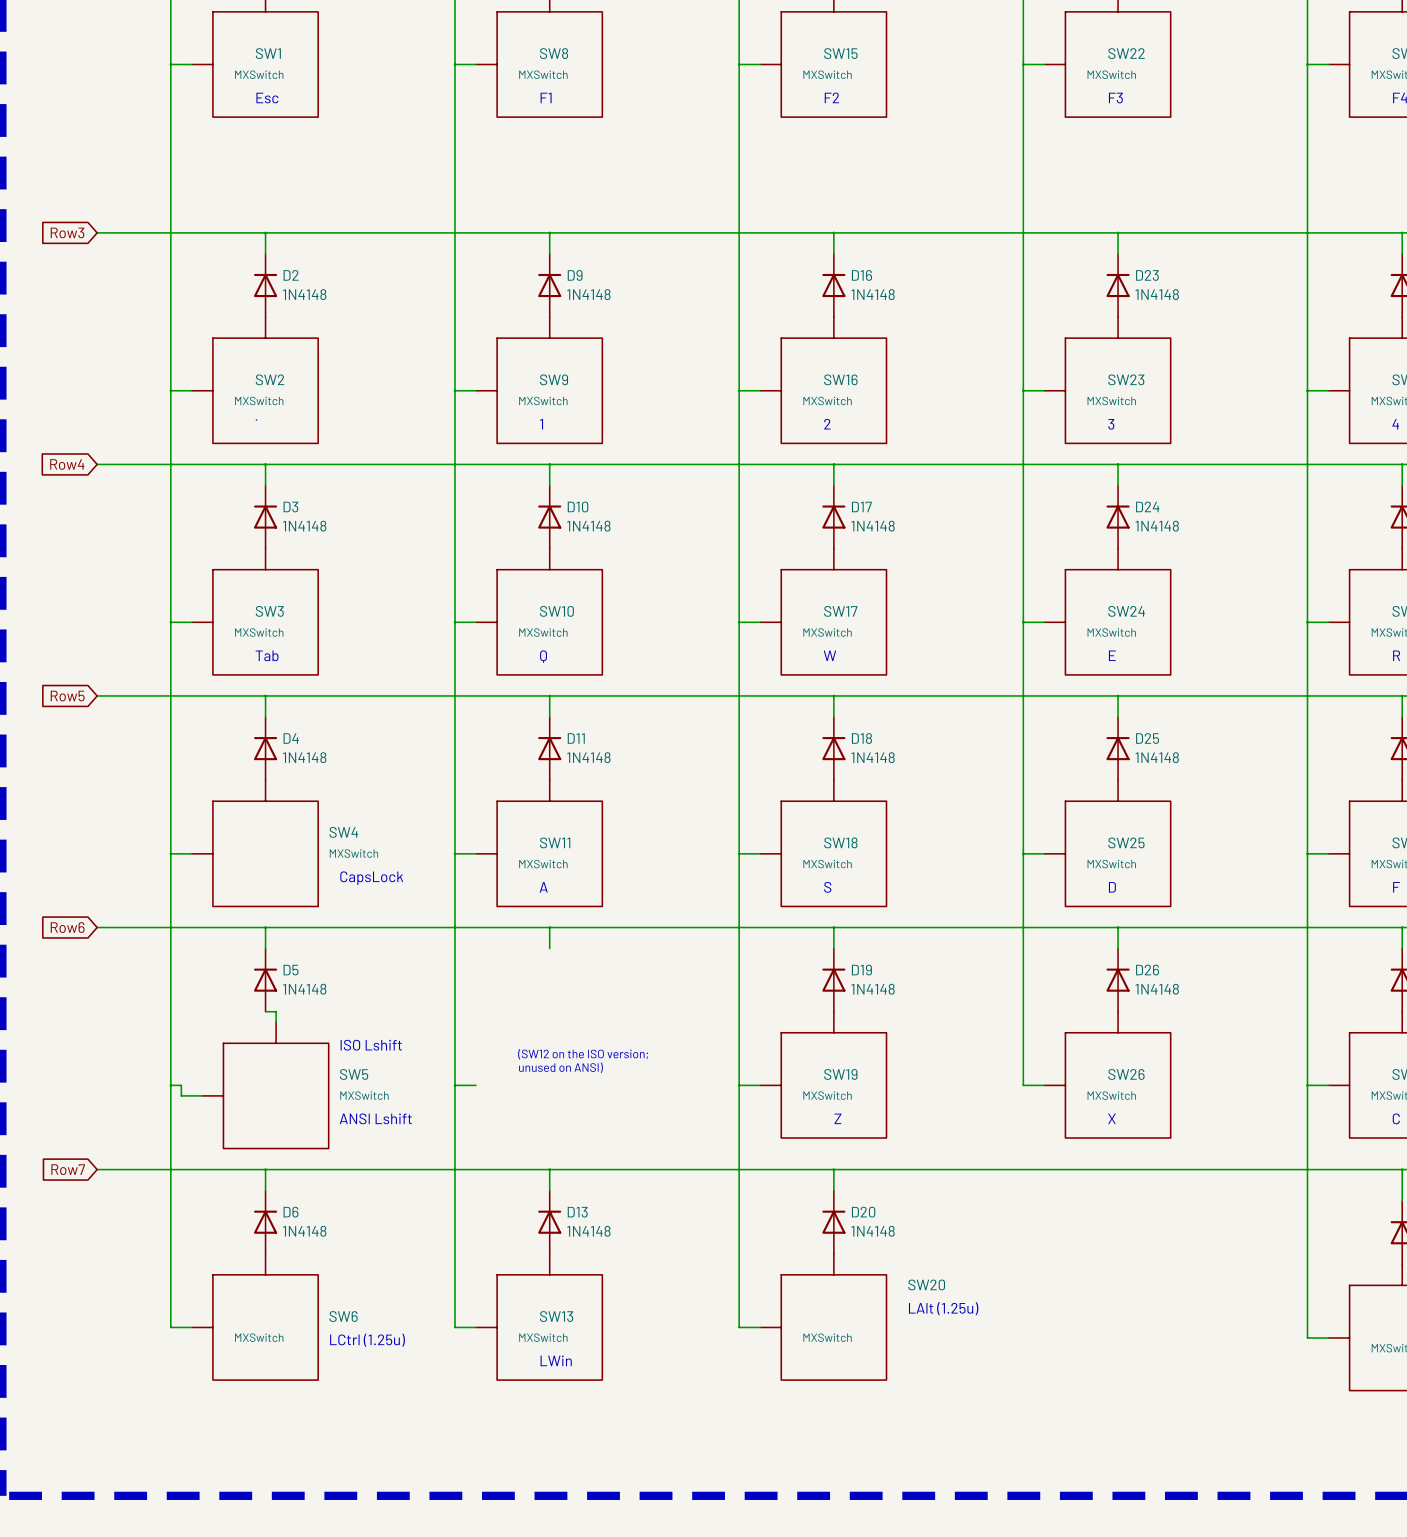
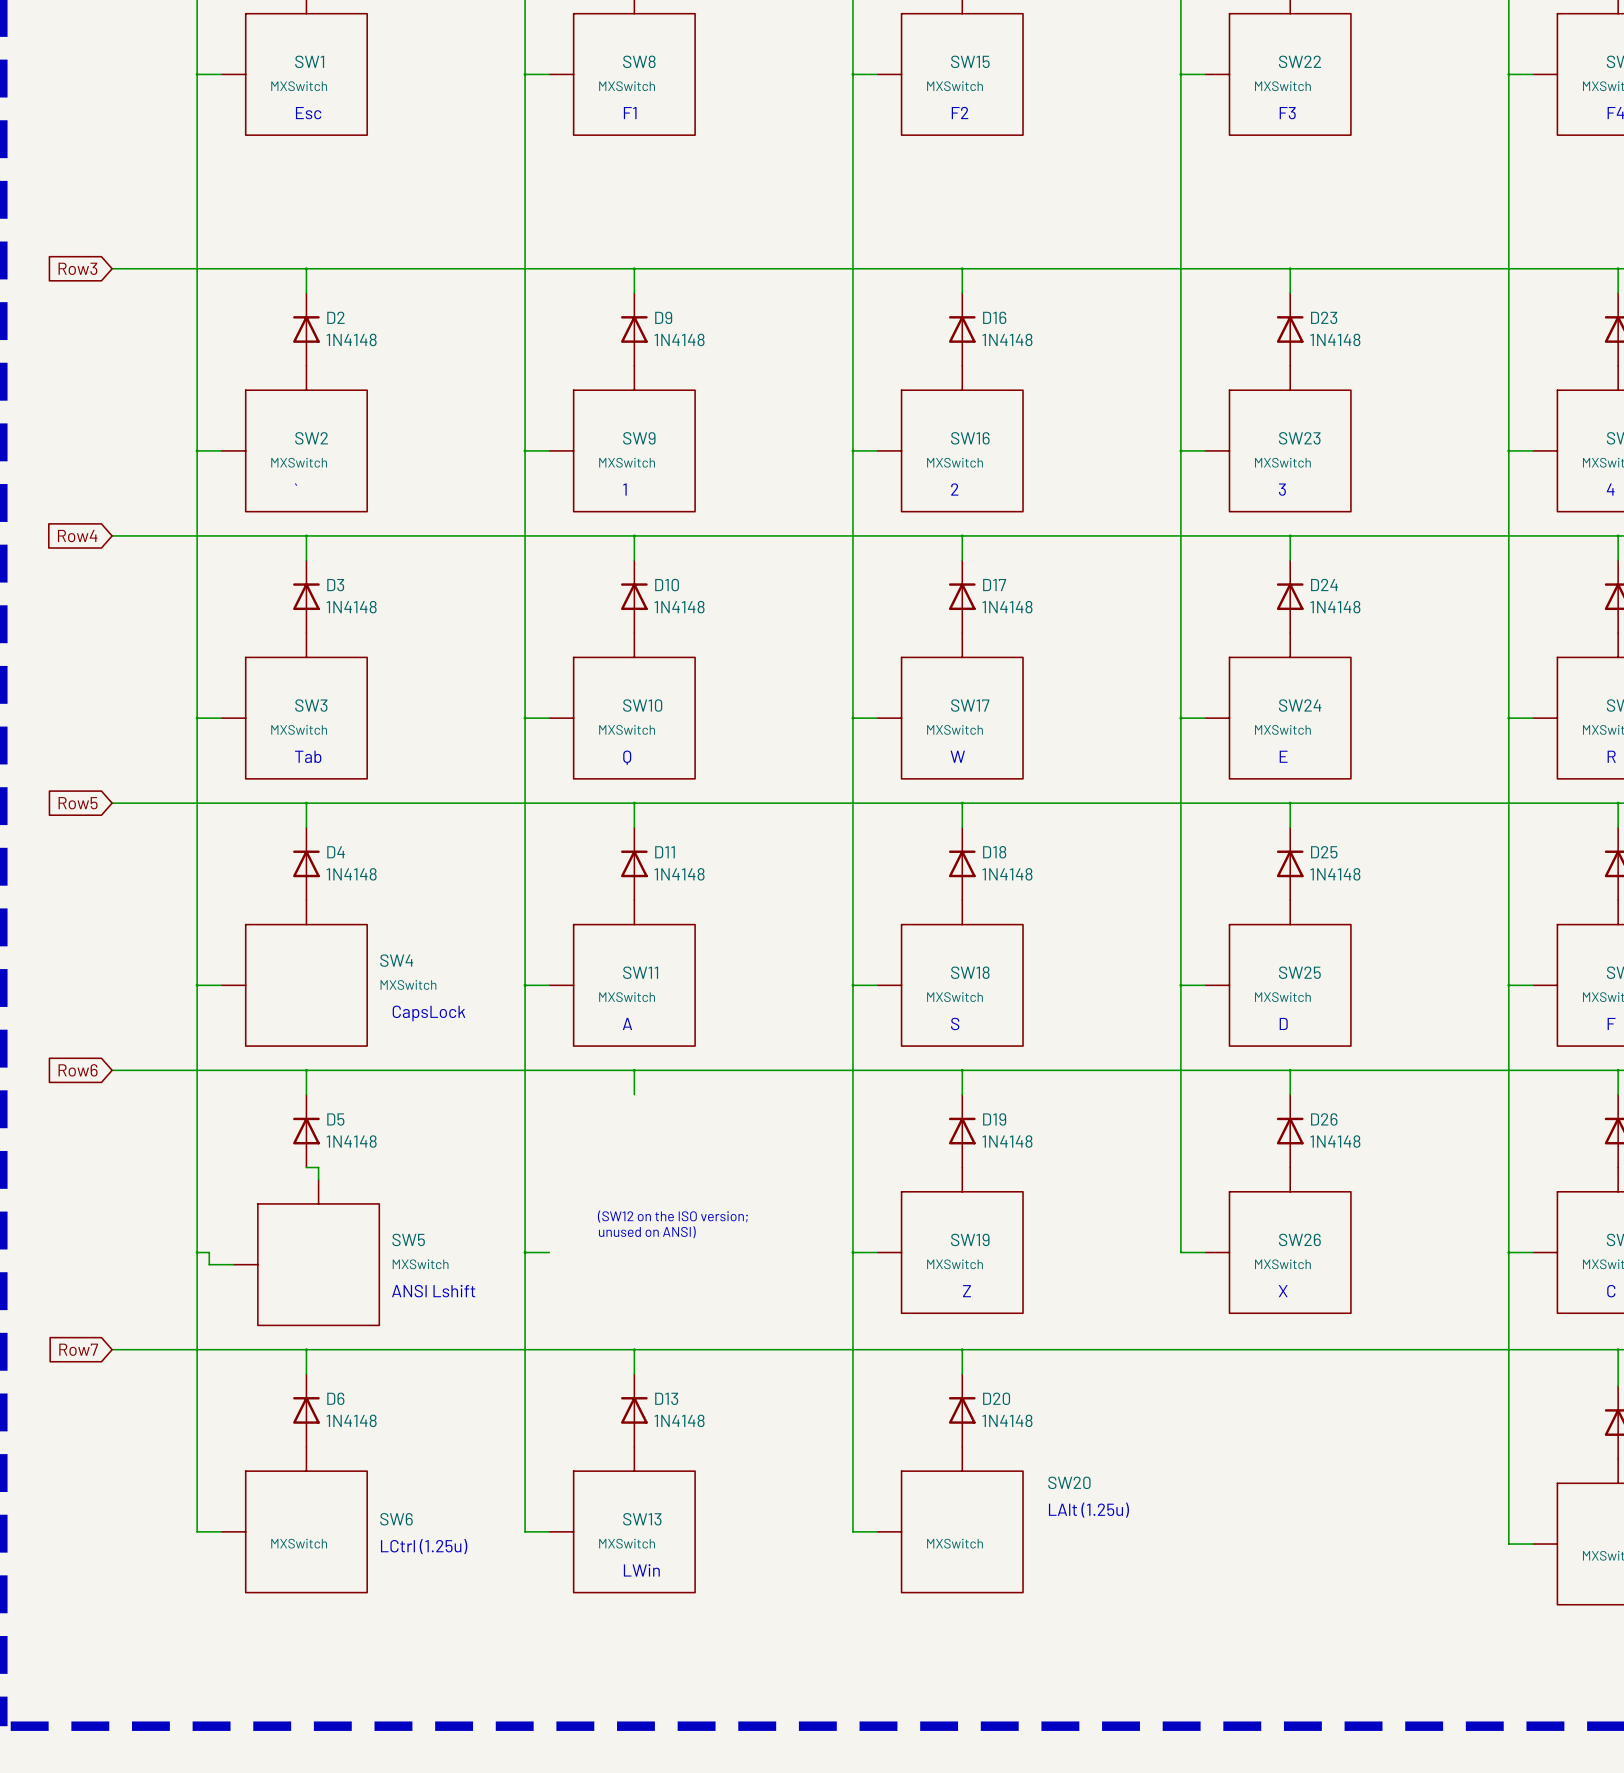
text: ISO Lshift (371, 1045) -> none

